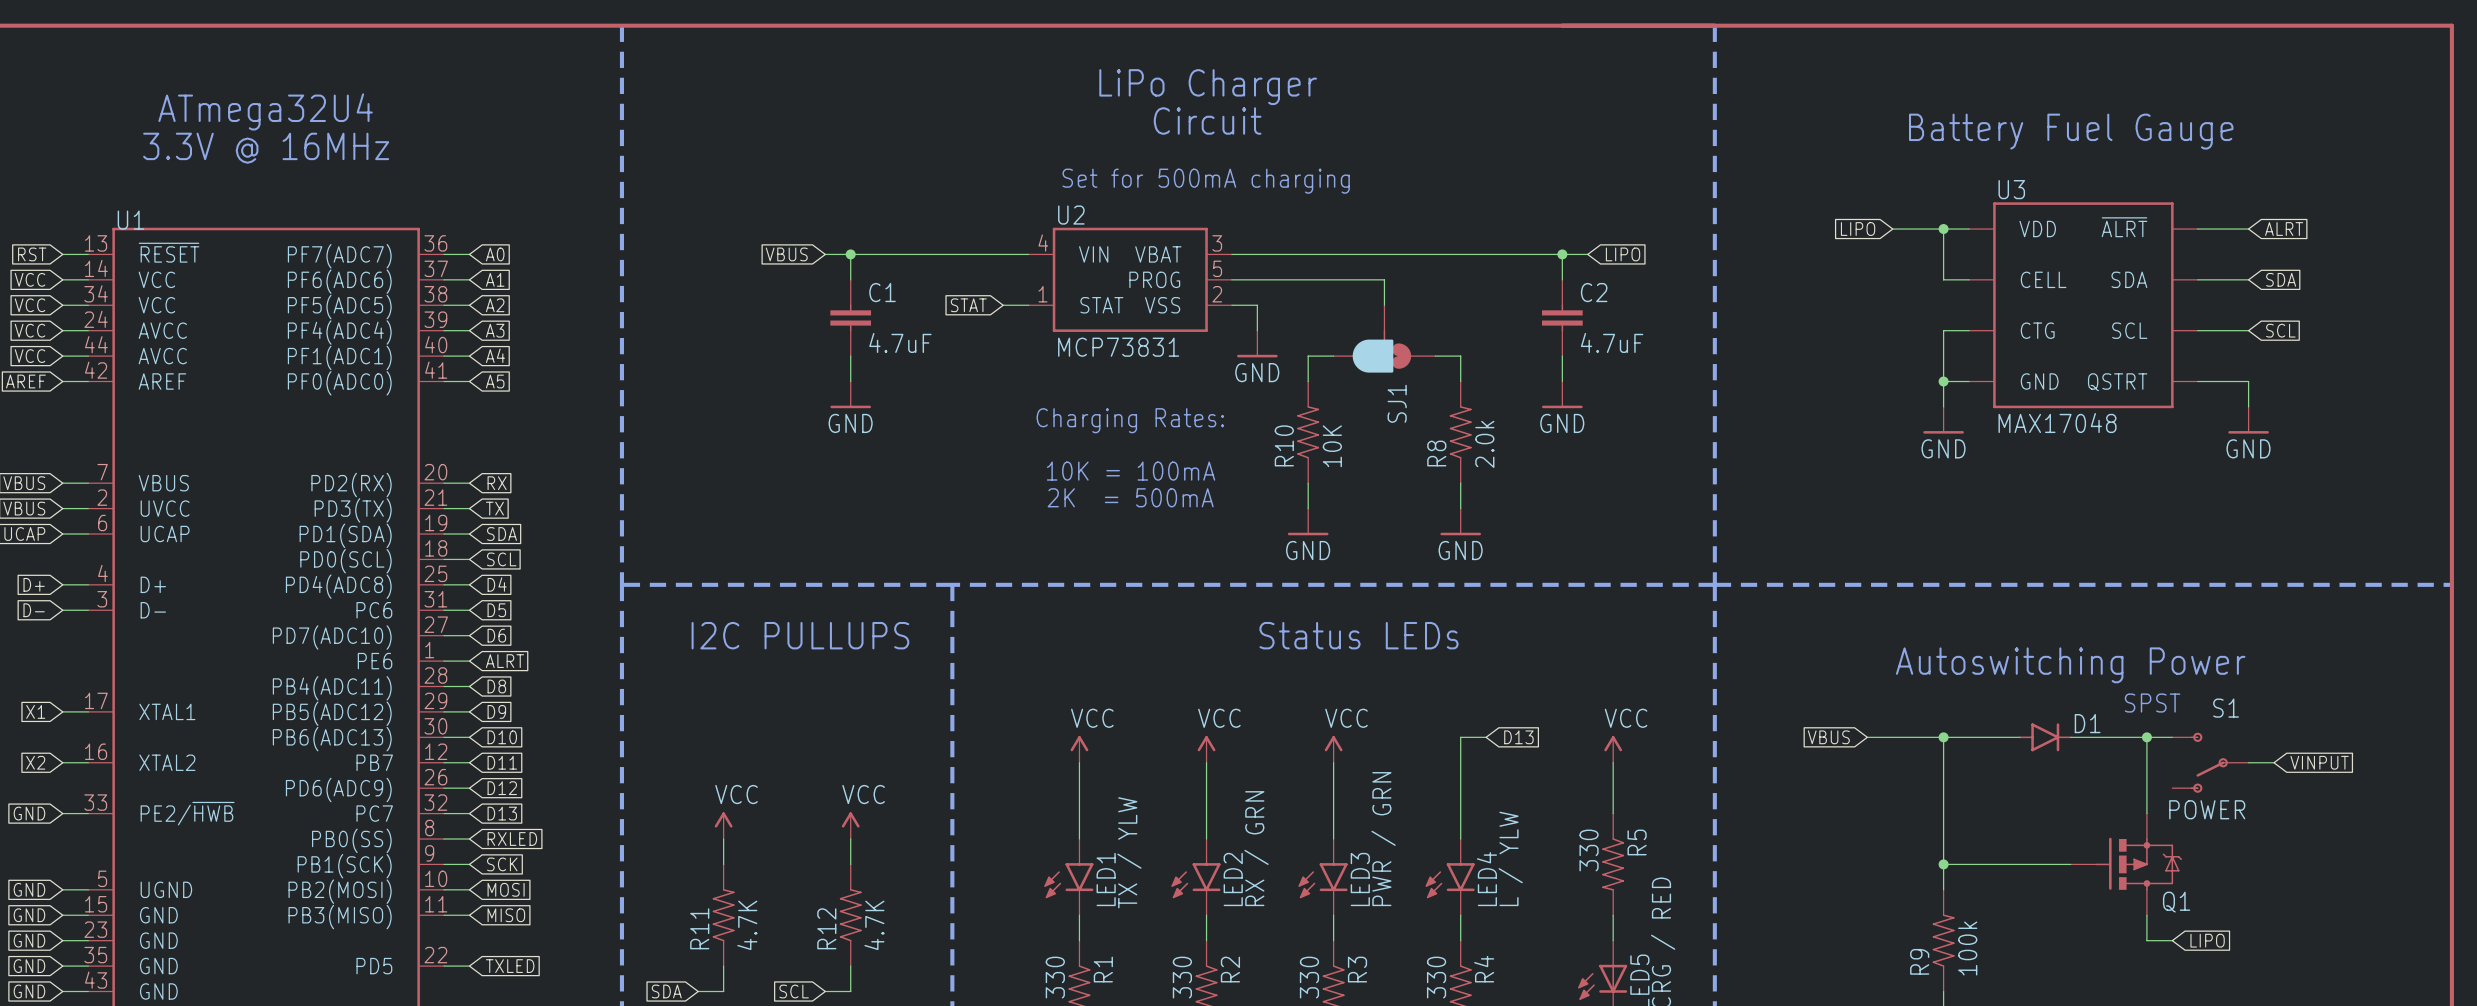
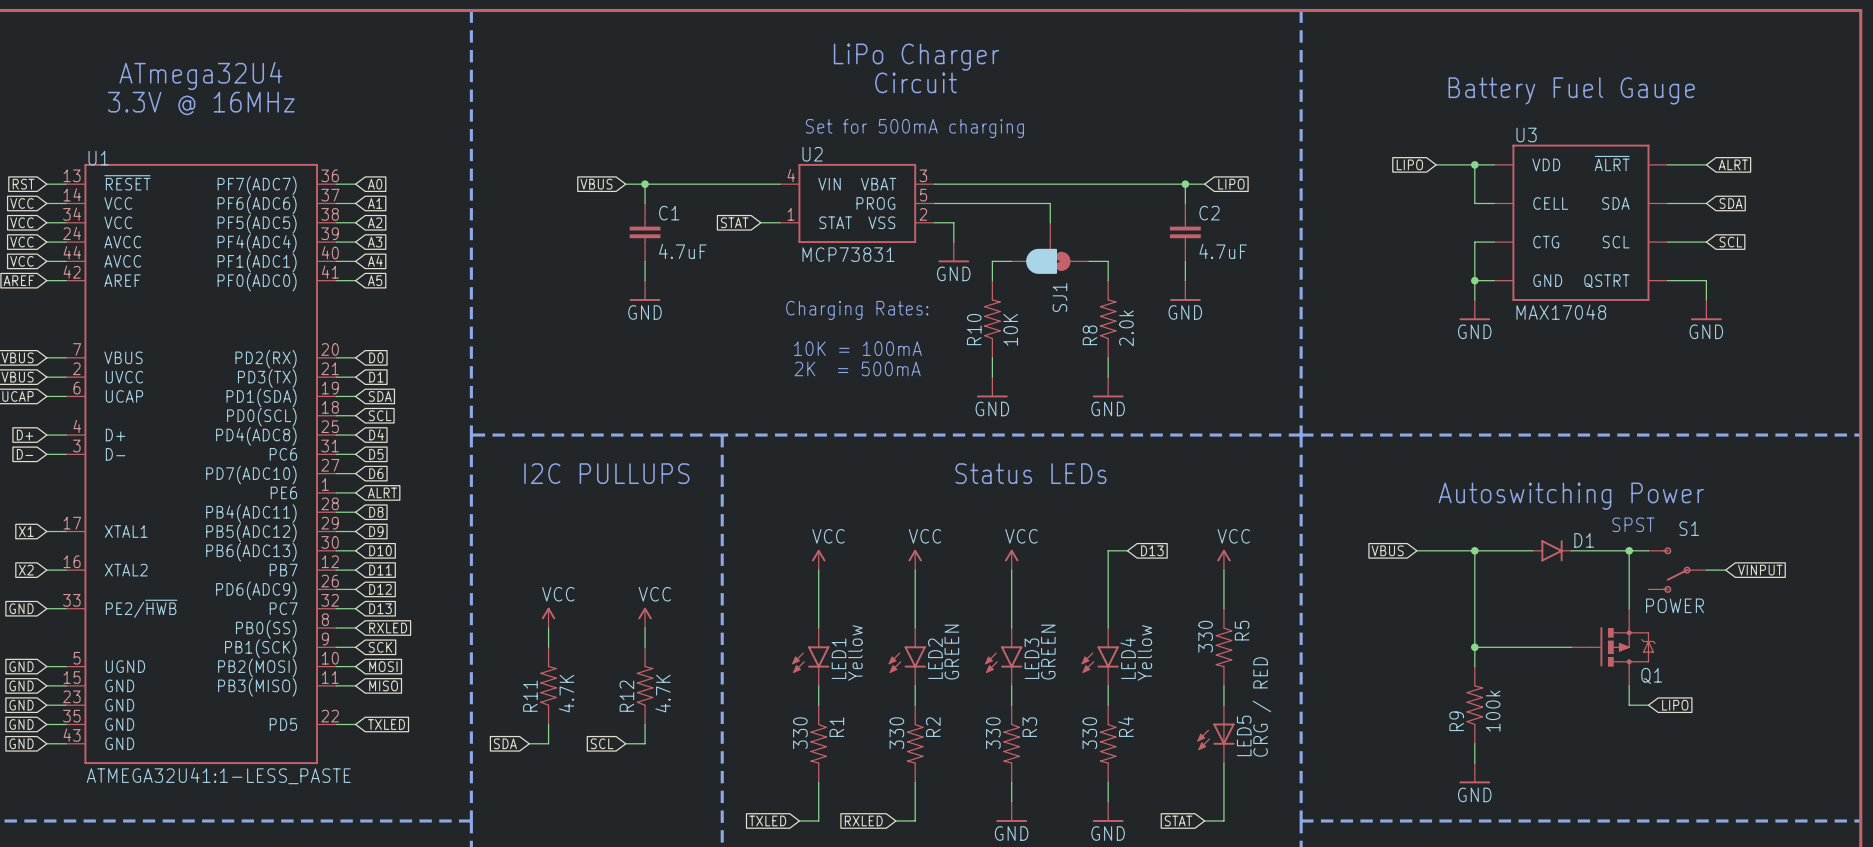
global label: RX (497, 483) -> D0 (376, 357)
global label: TX (494, 508) -> D1 (376, 377)
LED3 value: PWR / GRN (1383, 839) -> GREEN (1048, 652)
LED2 value: RX / GRN (1256, 848) -> GREEN (951, 652)
LED1 value: TX / YLW (1129, 852) -> Yellow (855, 652)
LED4 value: L / YLW (1510, 858) -> Yellow (1144, 652)

